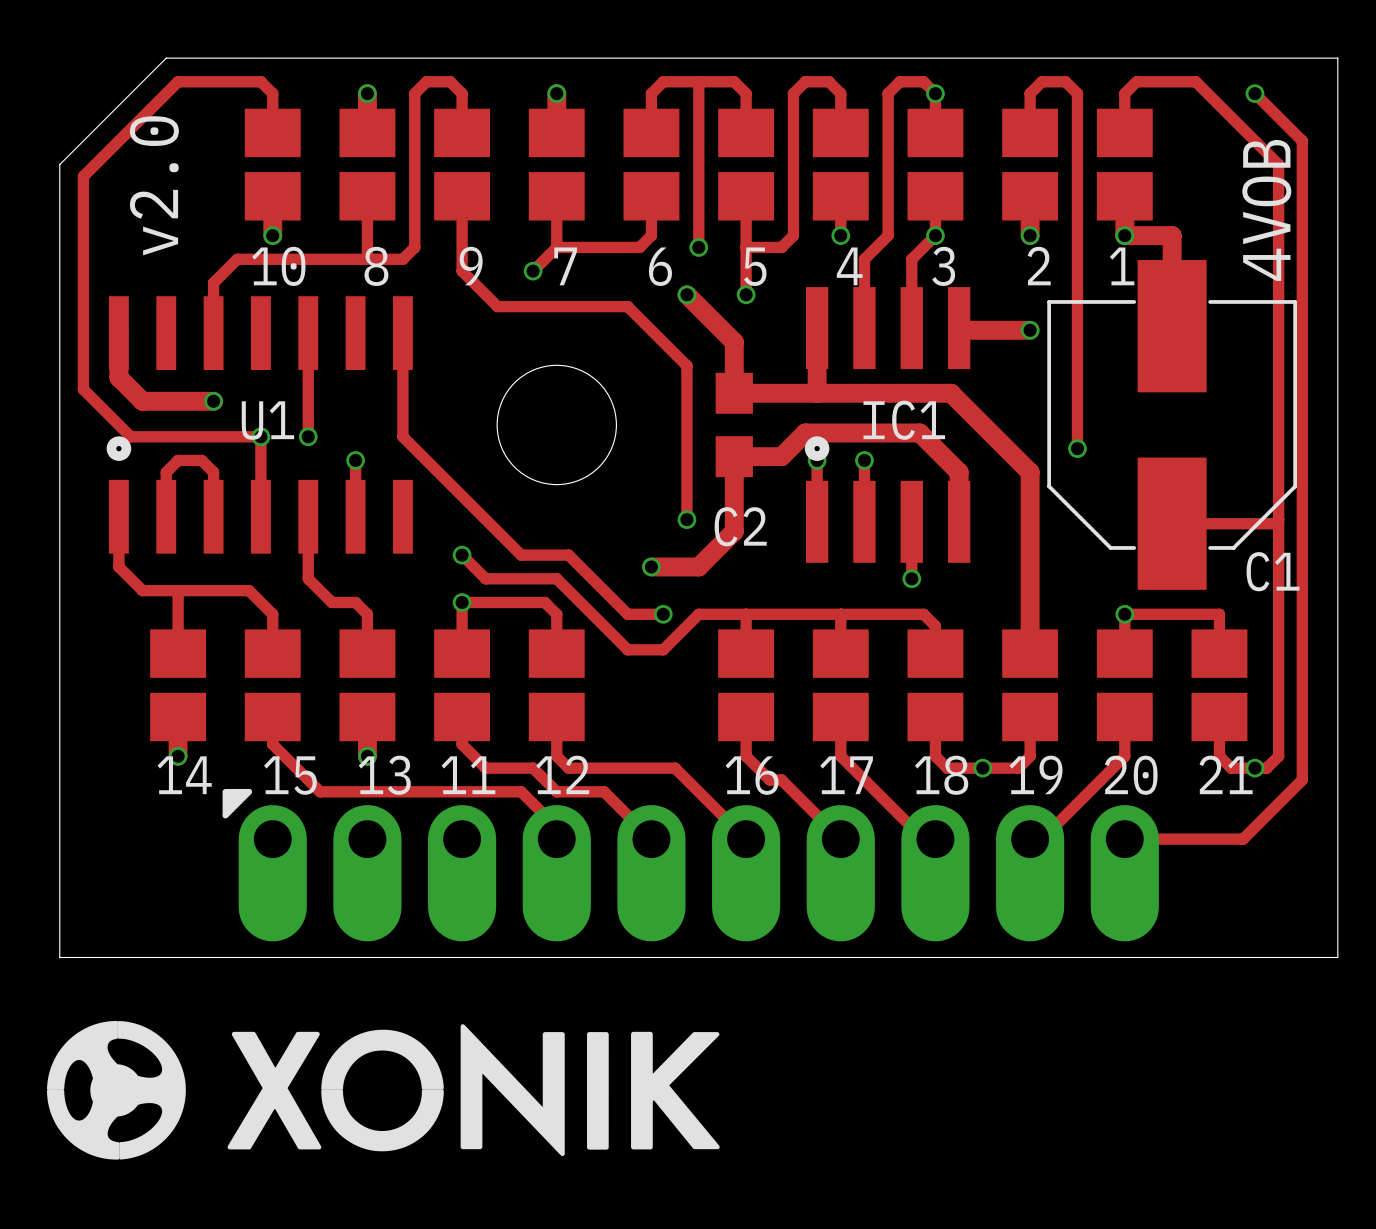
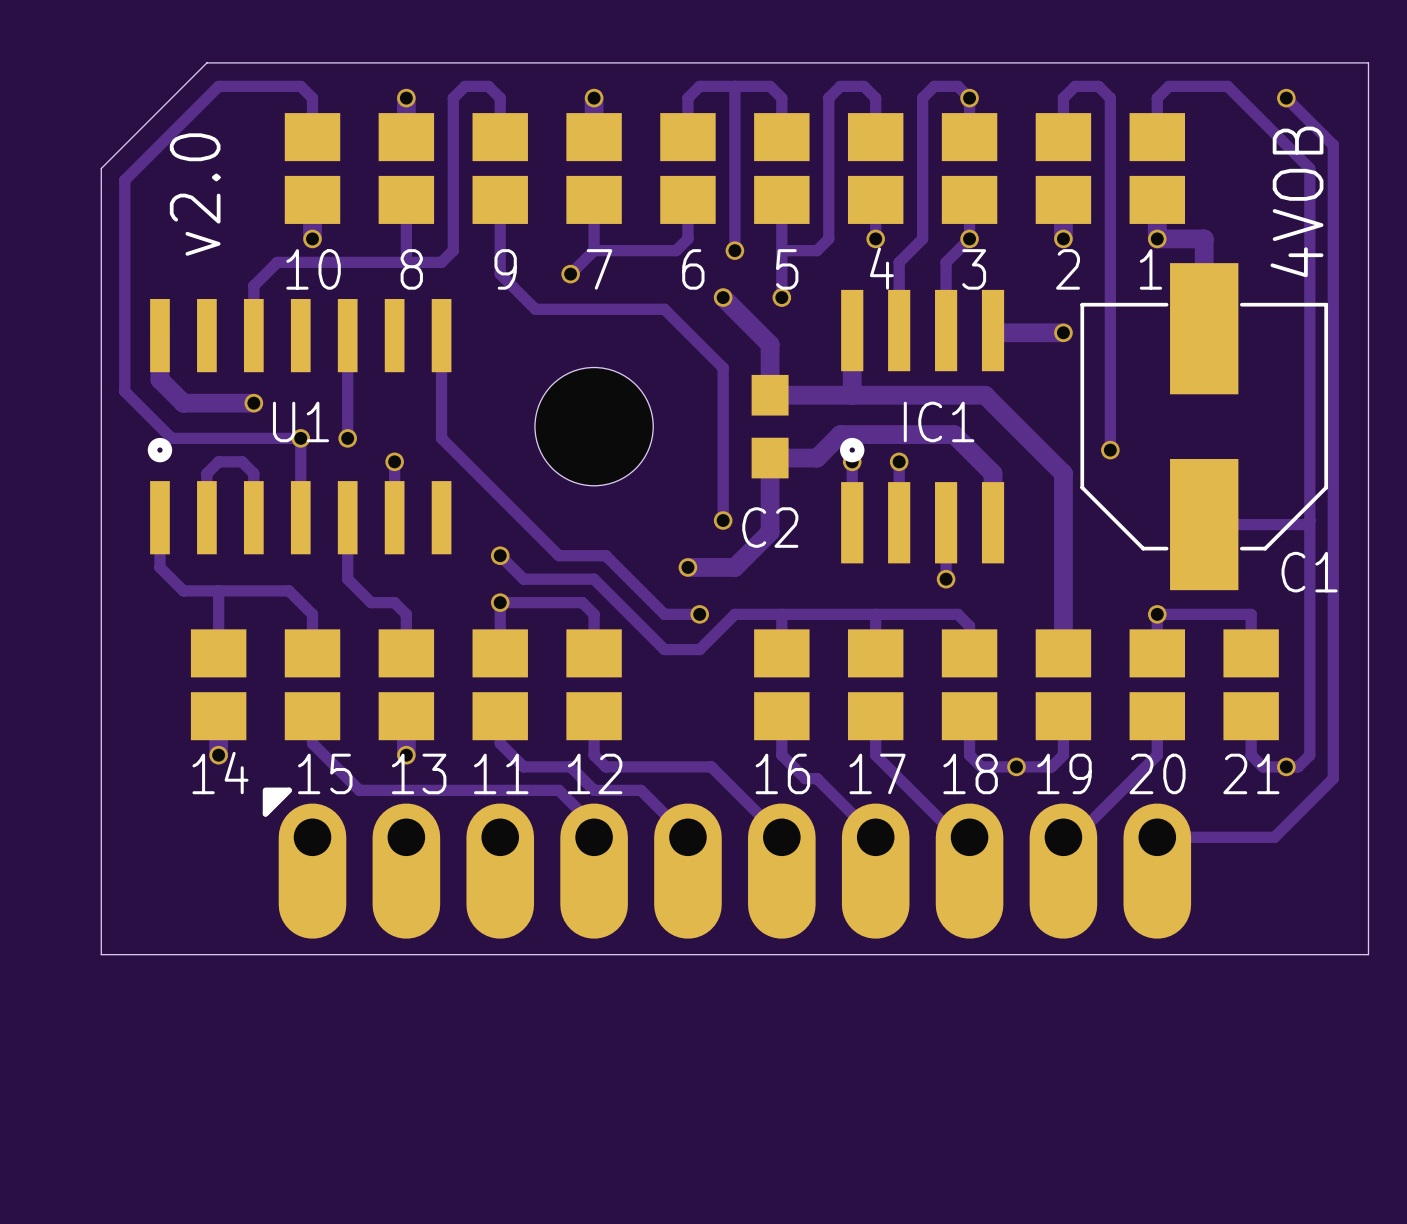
drawing: [46, 1020, 720, 1160] -> none

